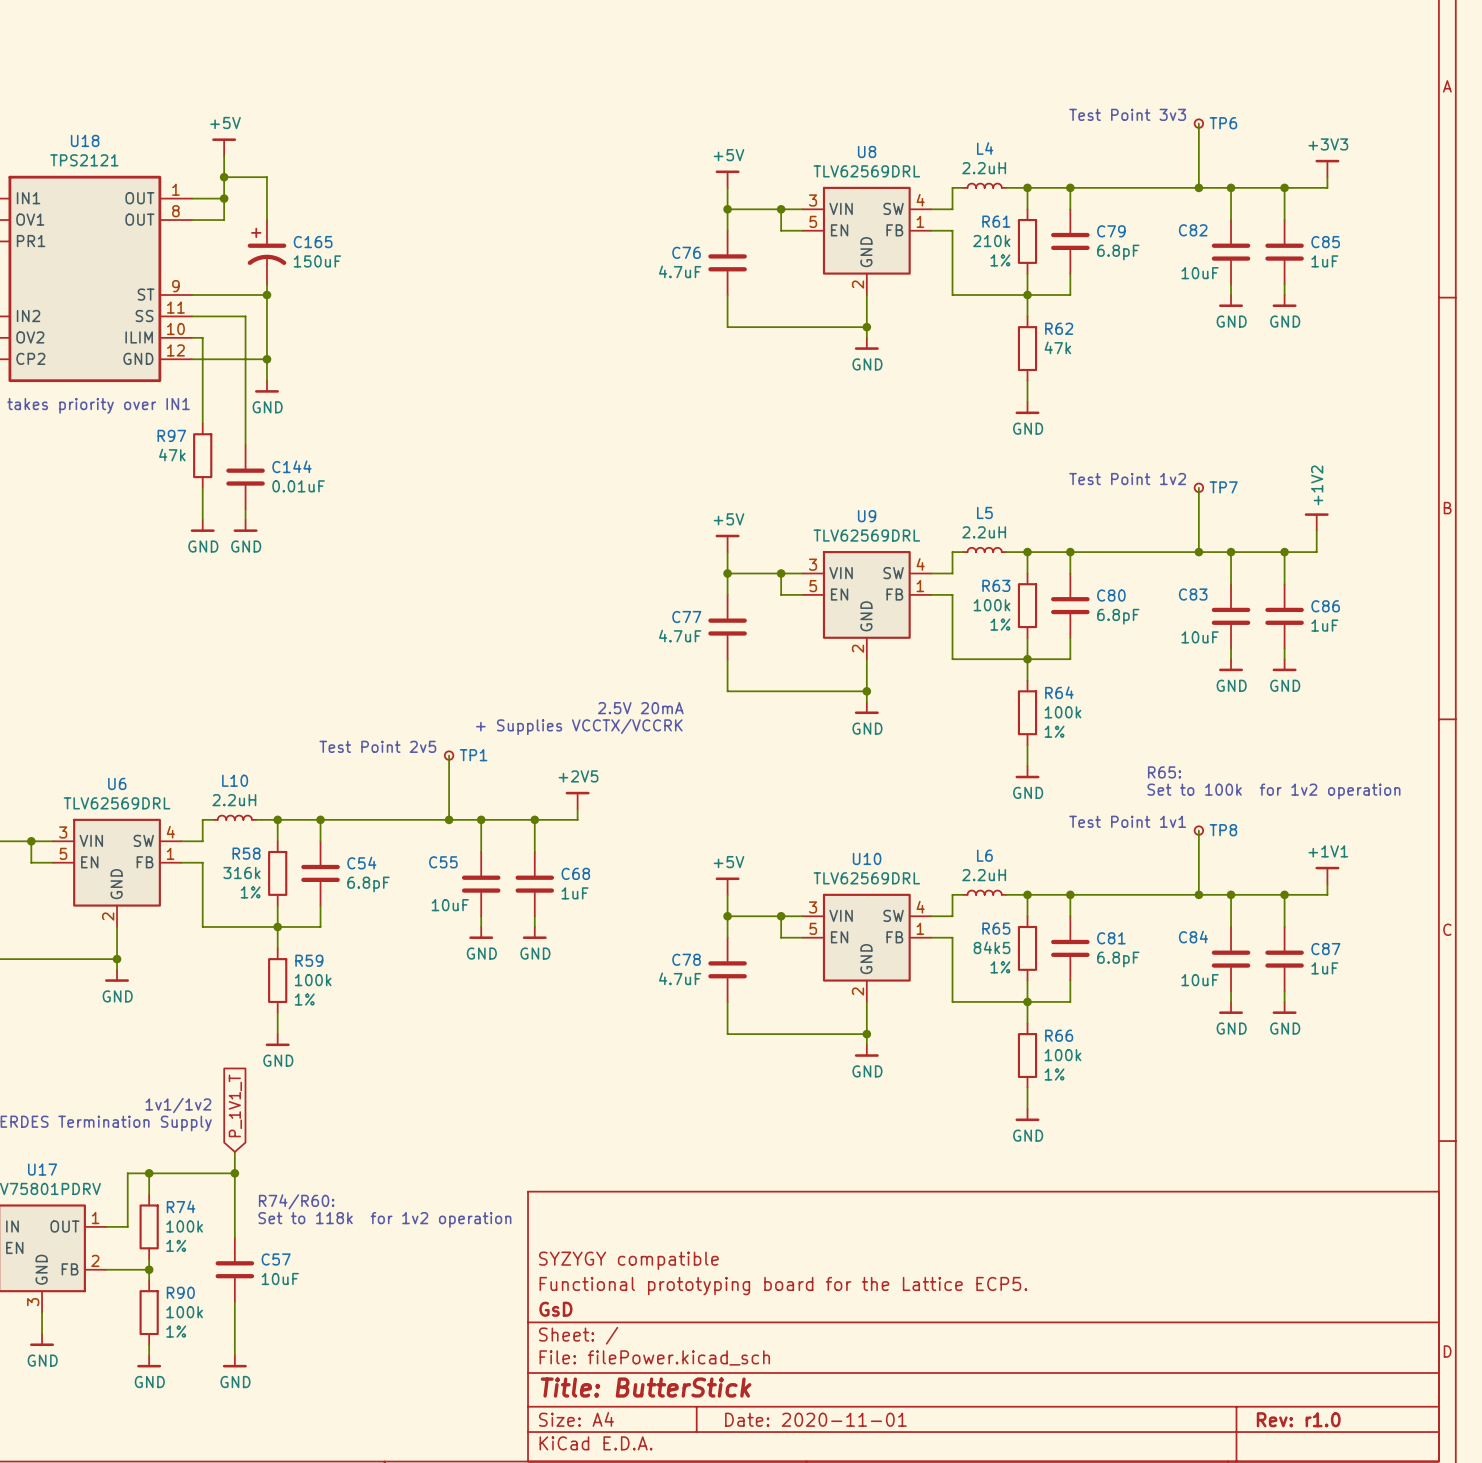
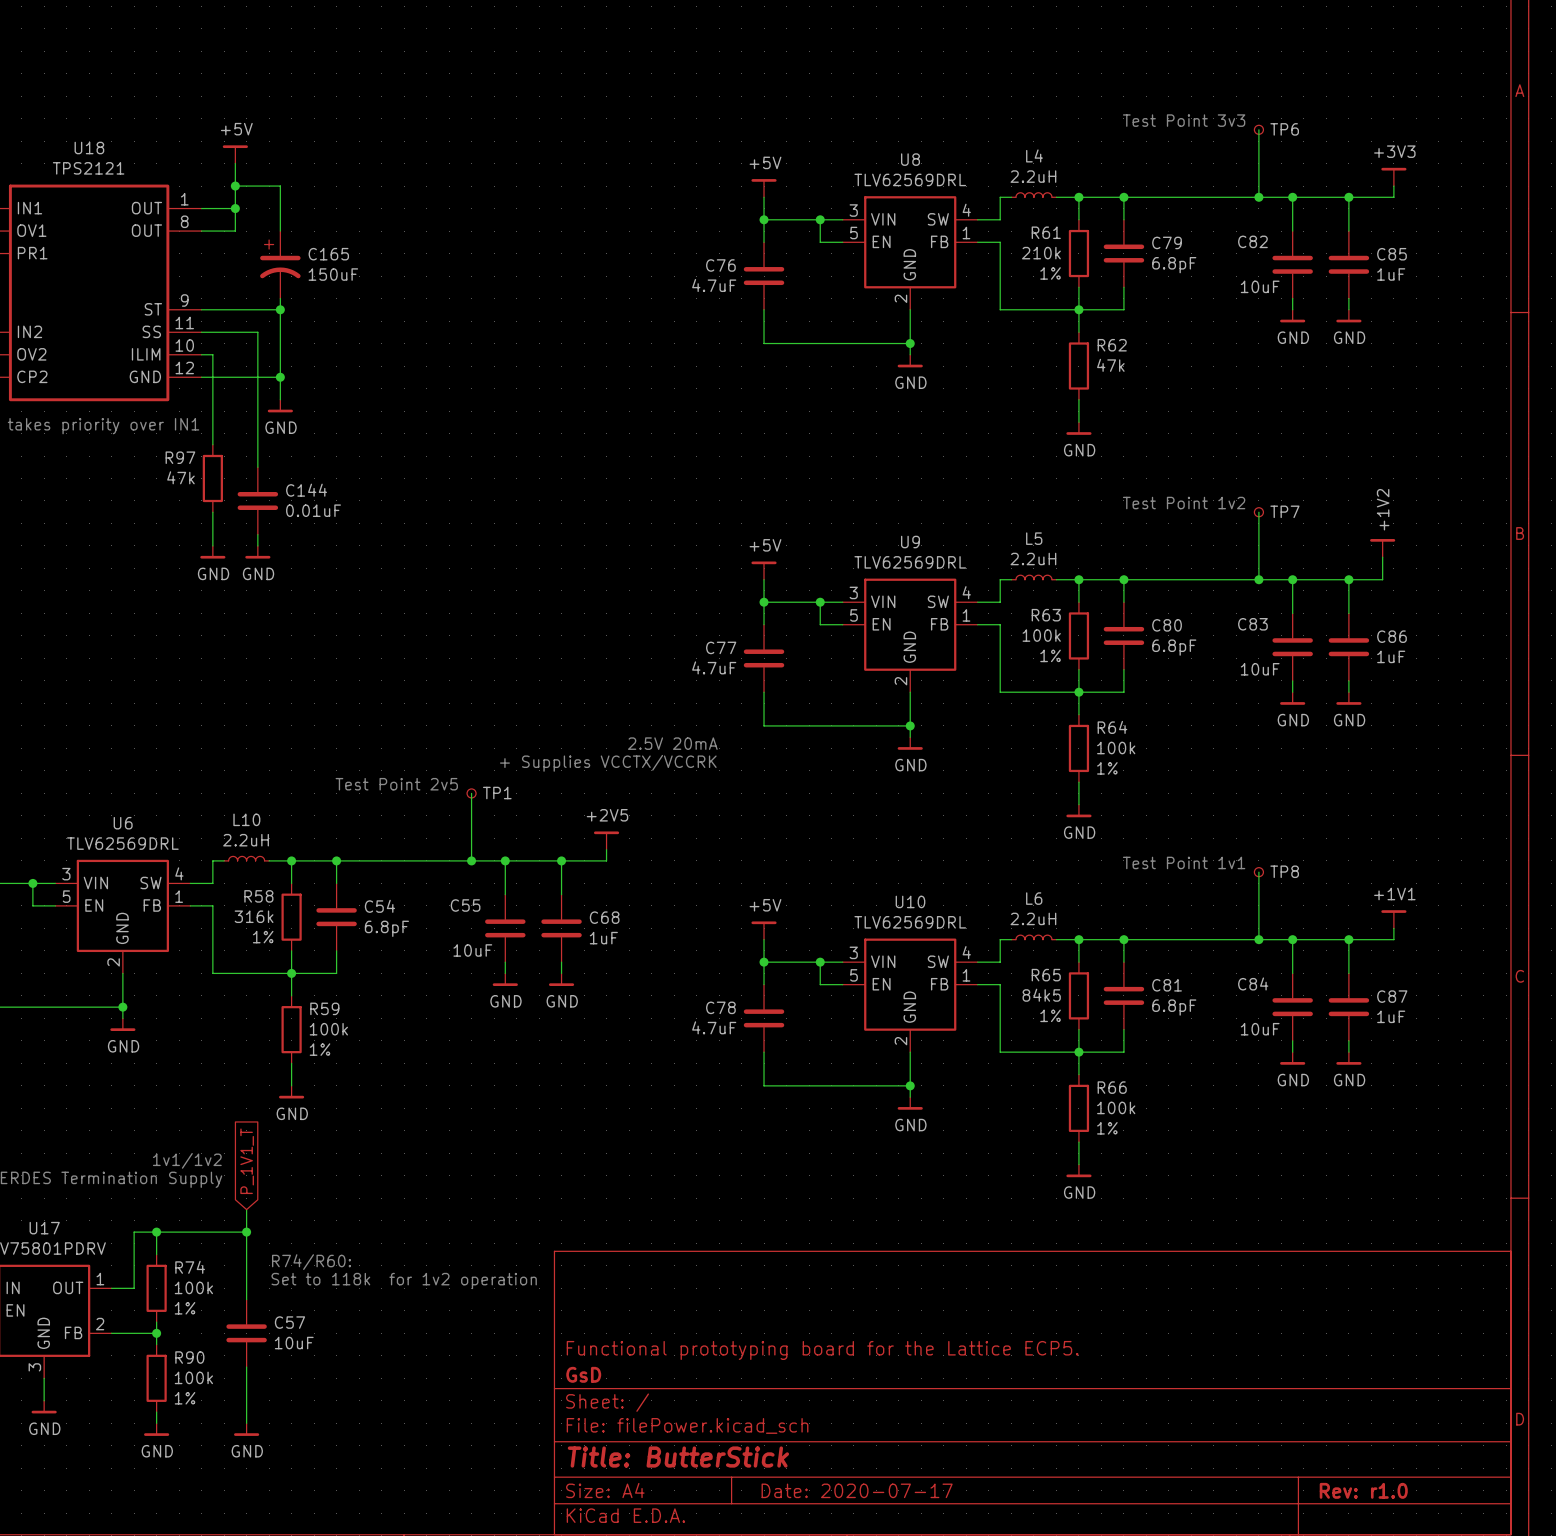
text: R65: (1164, 772) -> none
text: Set to 100k for 1v2 operation (1273, 791) -> none
title block: SYZYGY compatible (628, 1260) -> none
title block: Date: 2020-11-01 (815, 1419) -> Date: 2020-07-17 (857, 1490)

